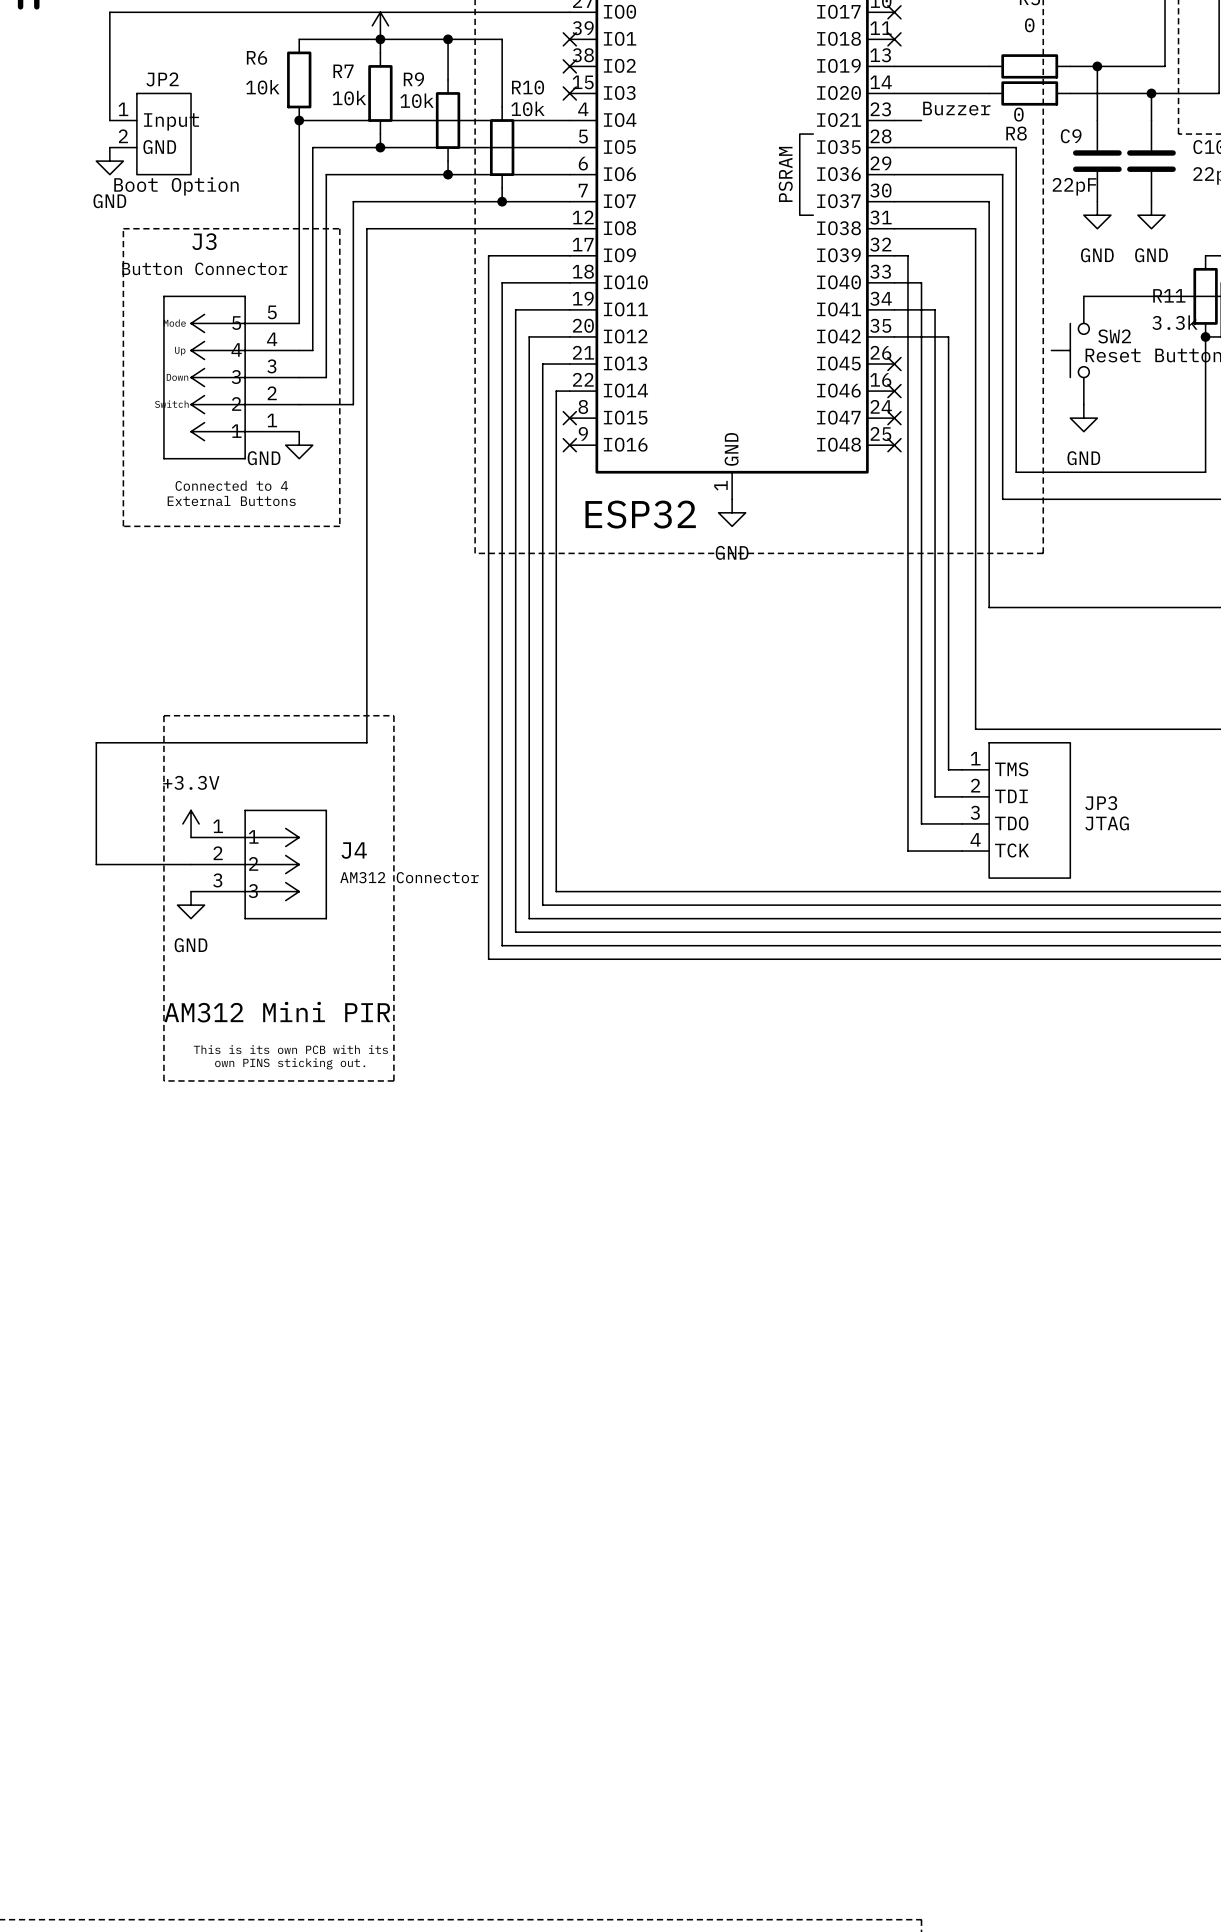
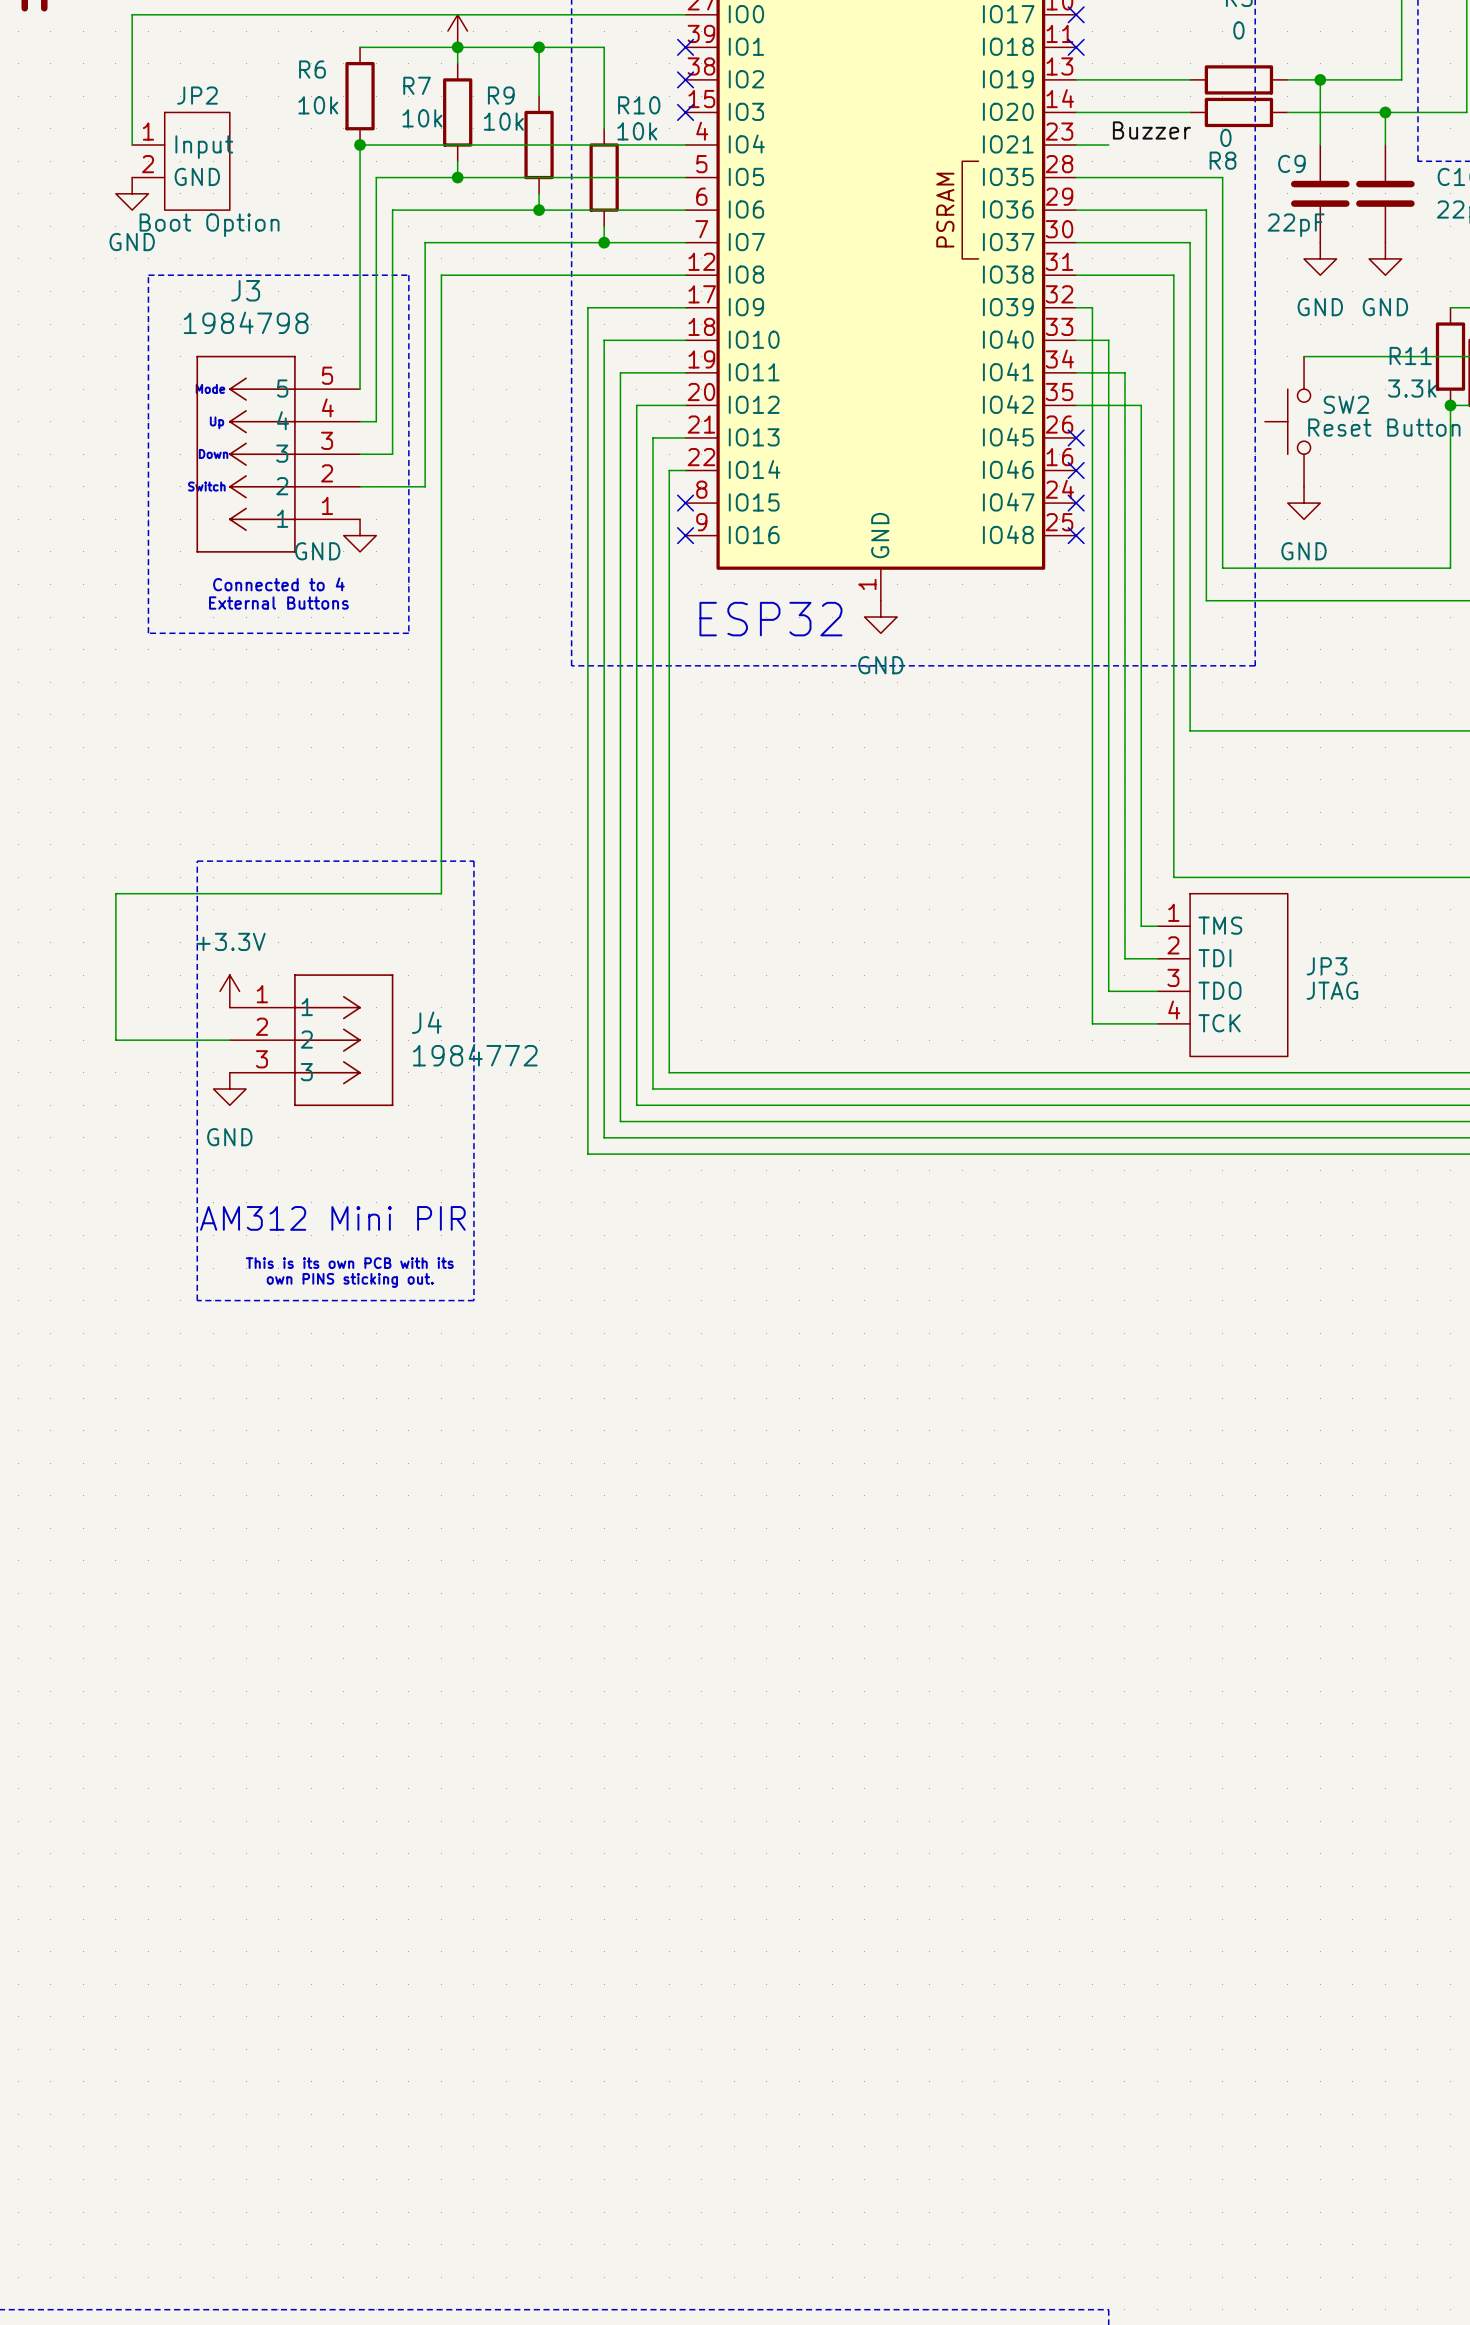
J3 value: Button Connector (204, 268) -> 1984798 (246, 322)
J4 value: AM312 Connector (409, 877) -> 1984772 (475, 1055)

